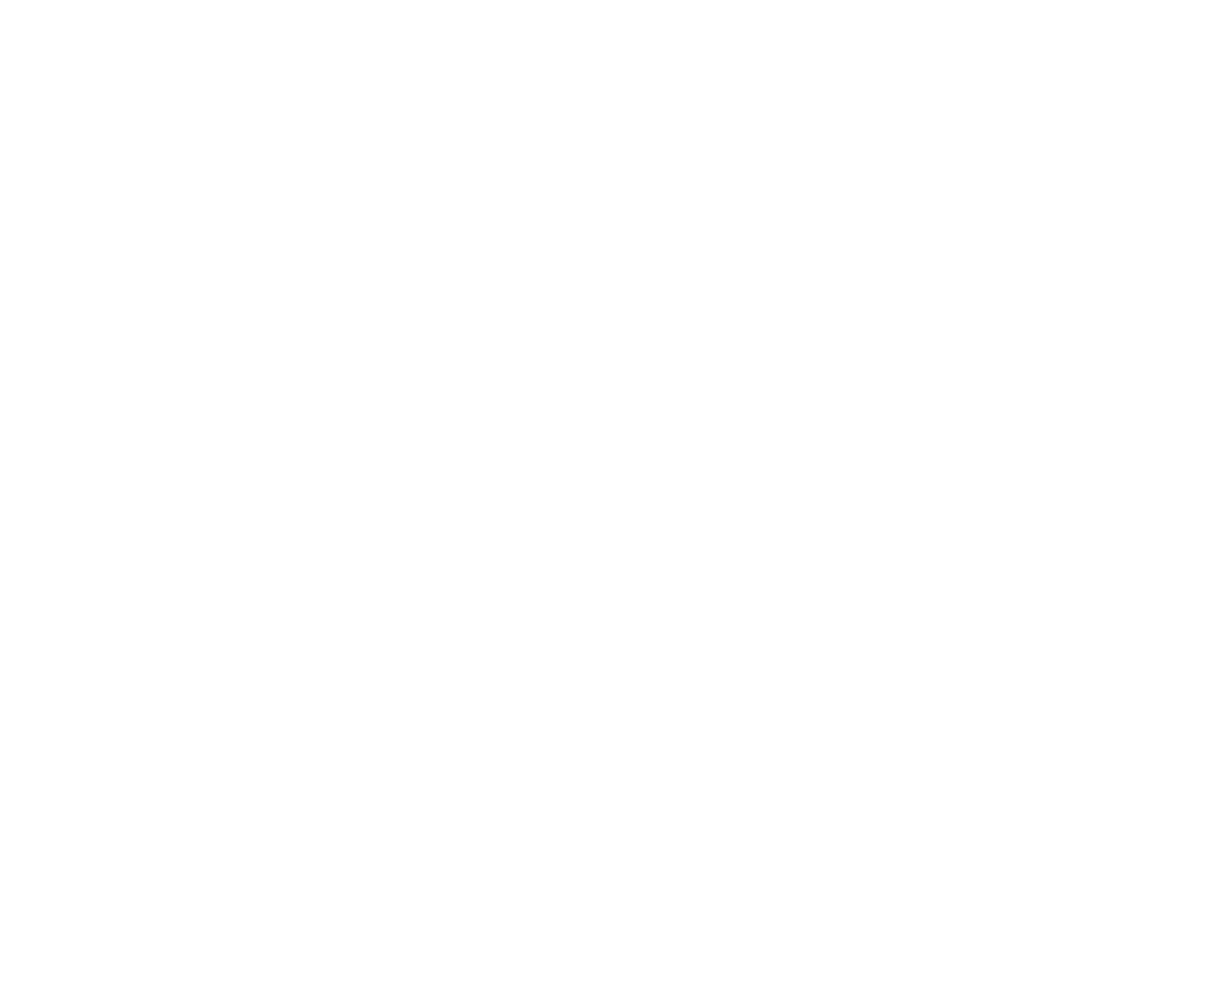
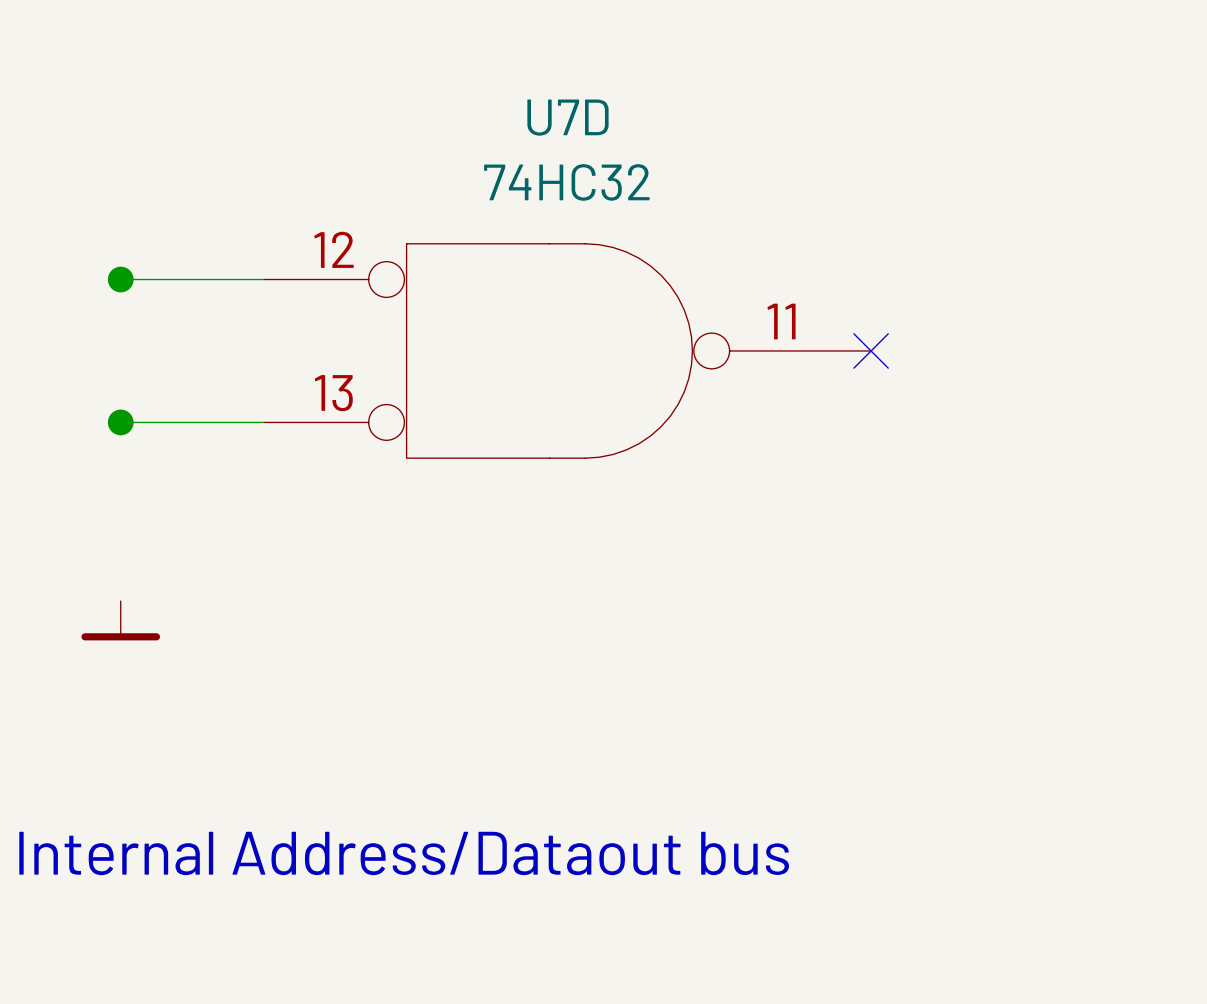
wire: none -> (120, 279) (263, 279)
junction: none -> (120, 279)
U7D: none -> 74HC32 (567, 350)
no-connect mark: none -> (871, 350)
wire: none -> (120, 422) (263, 422)
junction: none -> (120, 422)
power symbol: none -> (120, 620)
text: none -> Internal Address/Dataout bus (404, 853)

